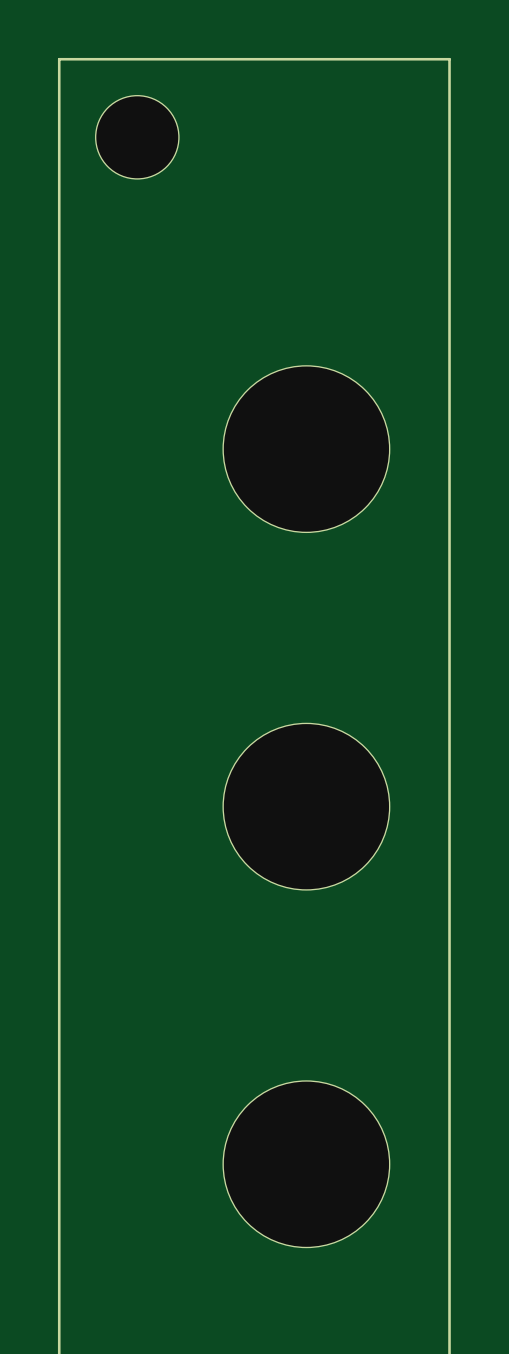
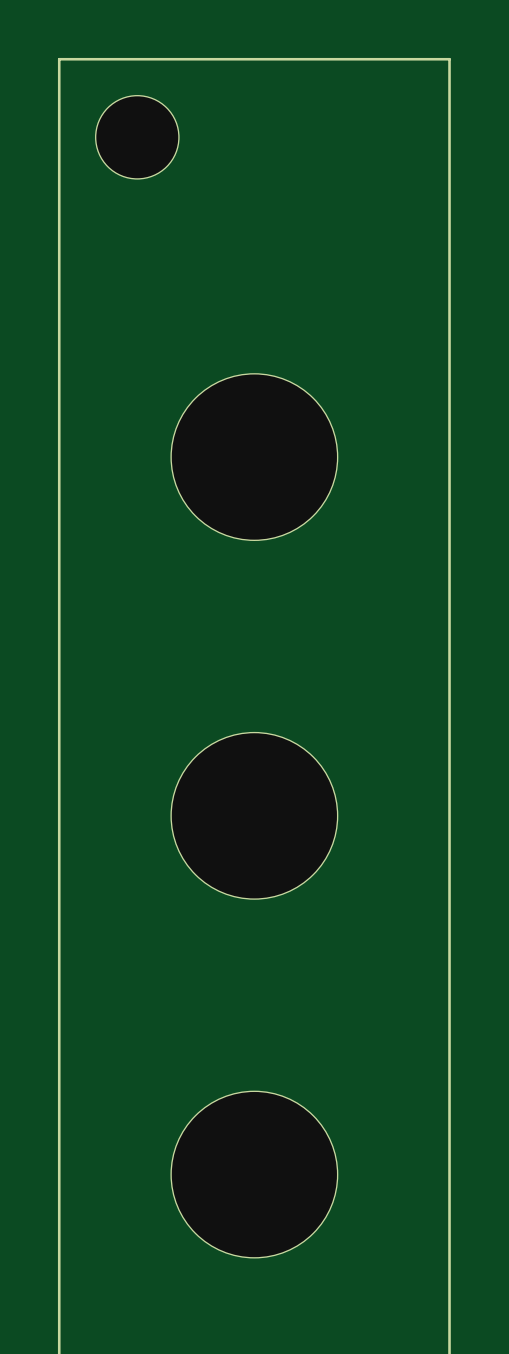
part position: (306, 449) -> (254, 457)
part position: (306, 806) -> (254, 815)
part position: (306, 1164) -> (254, 1174)

